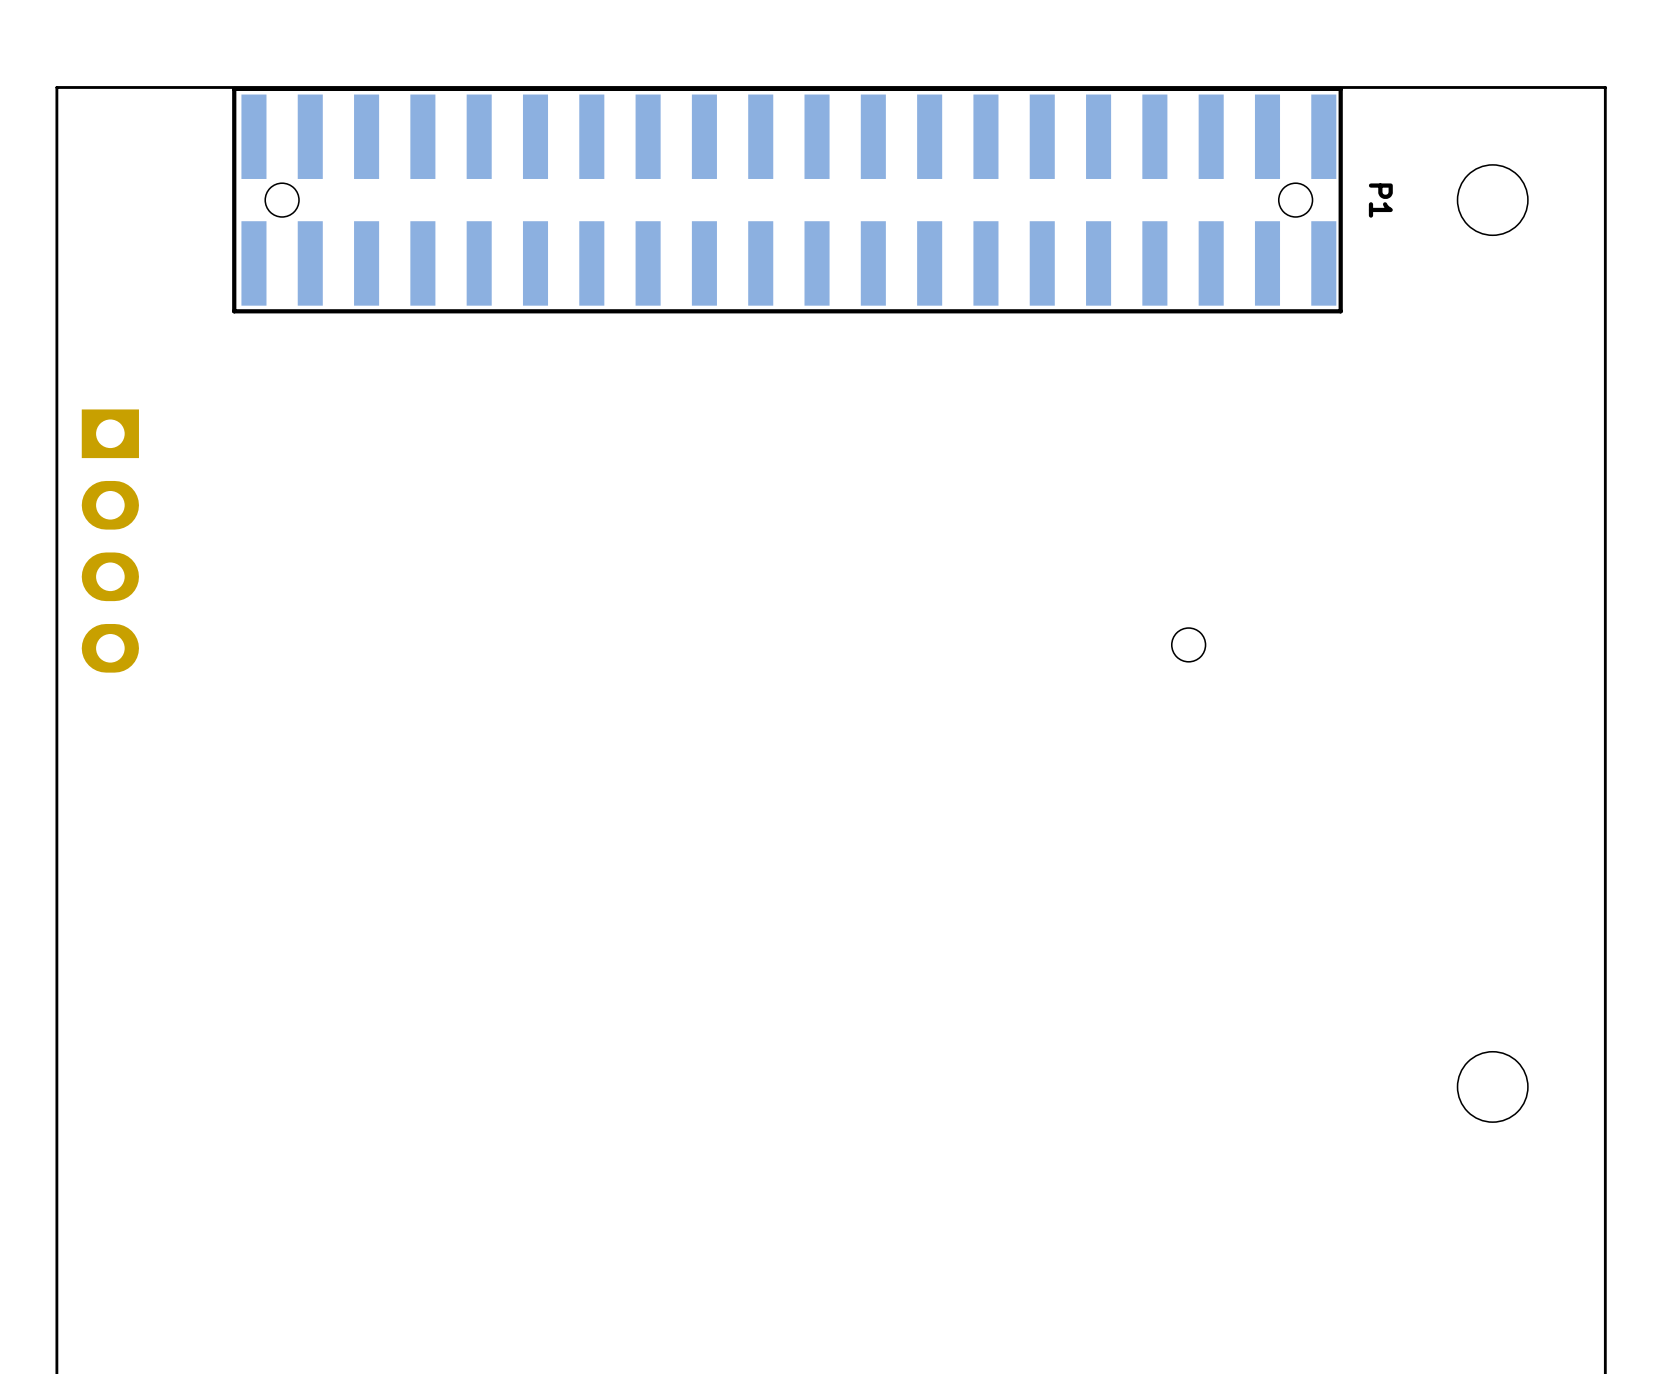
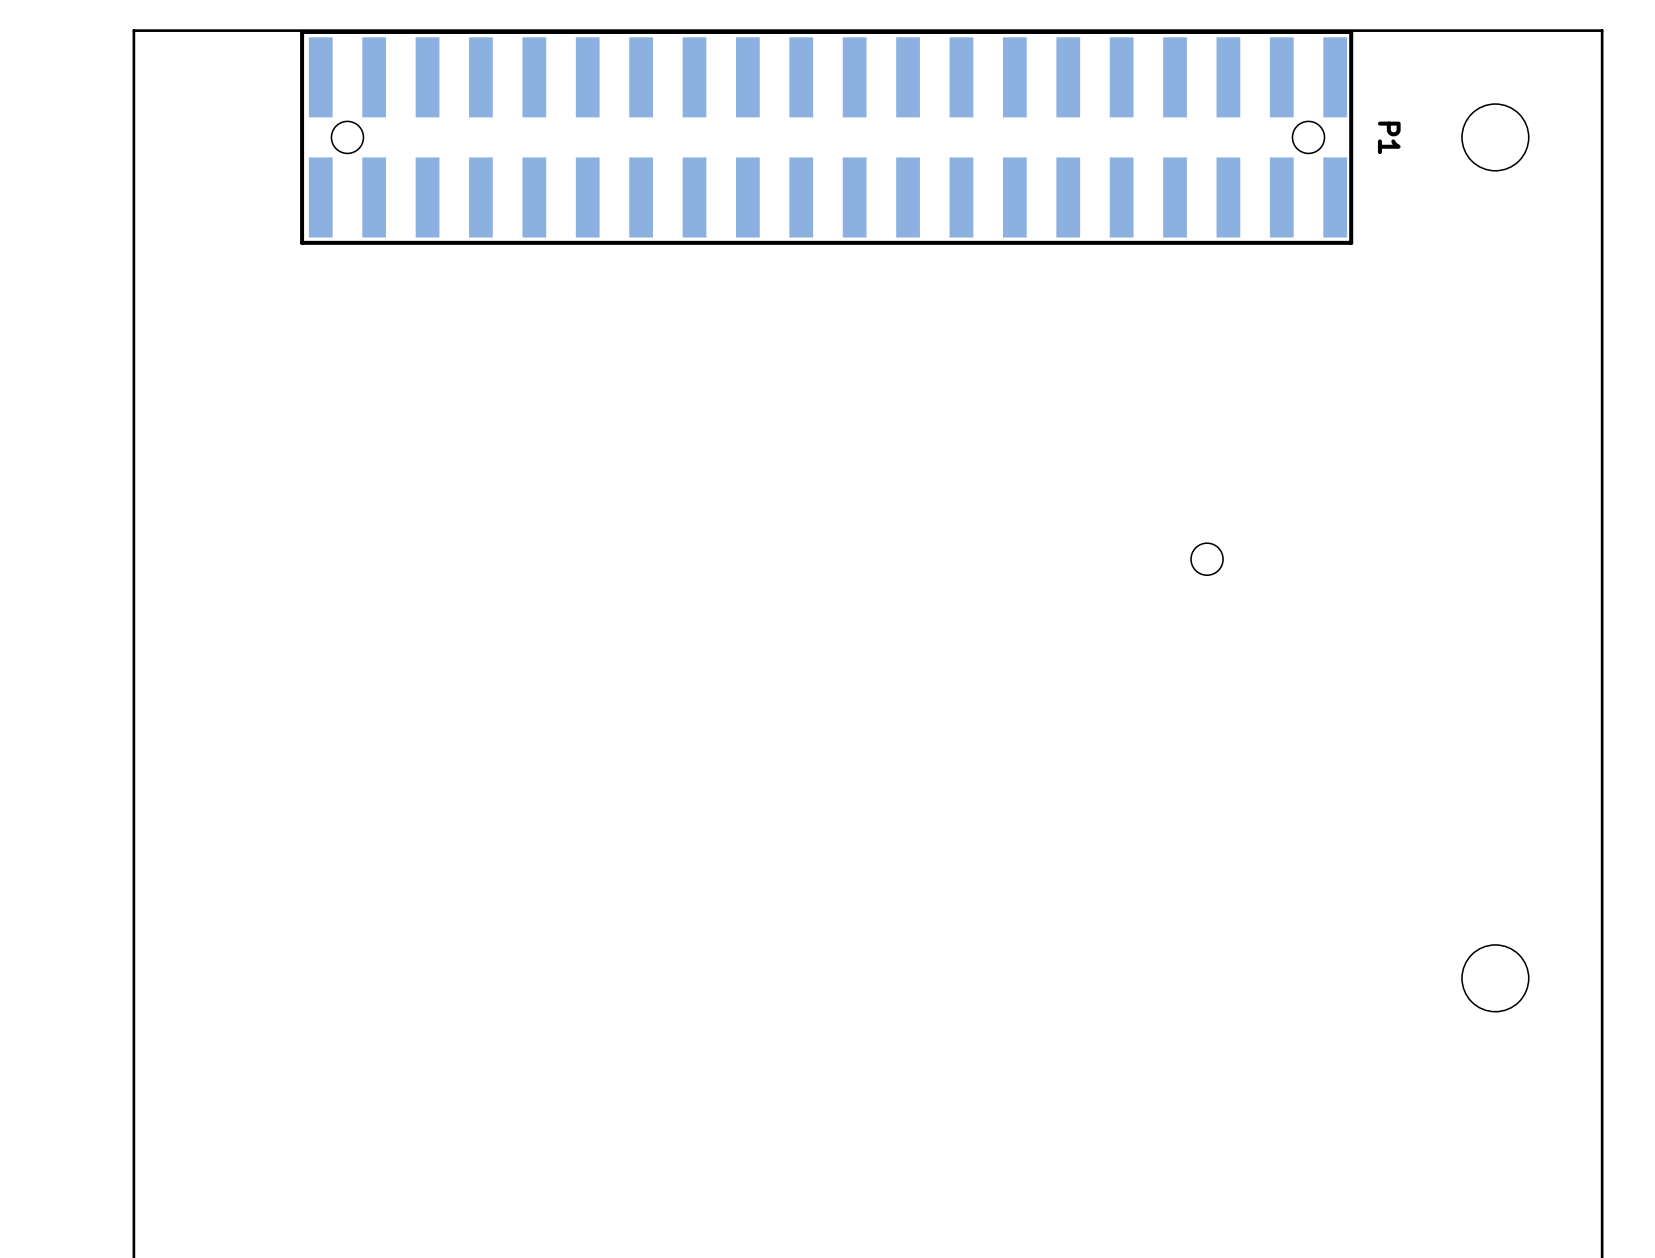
part: (110, 541) -> none

